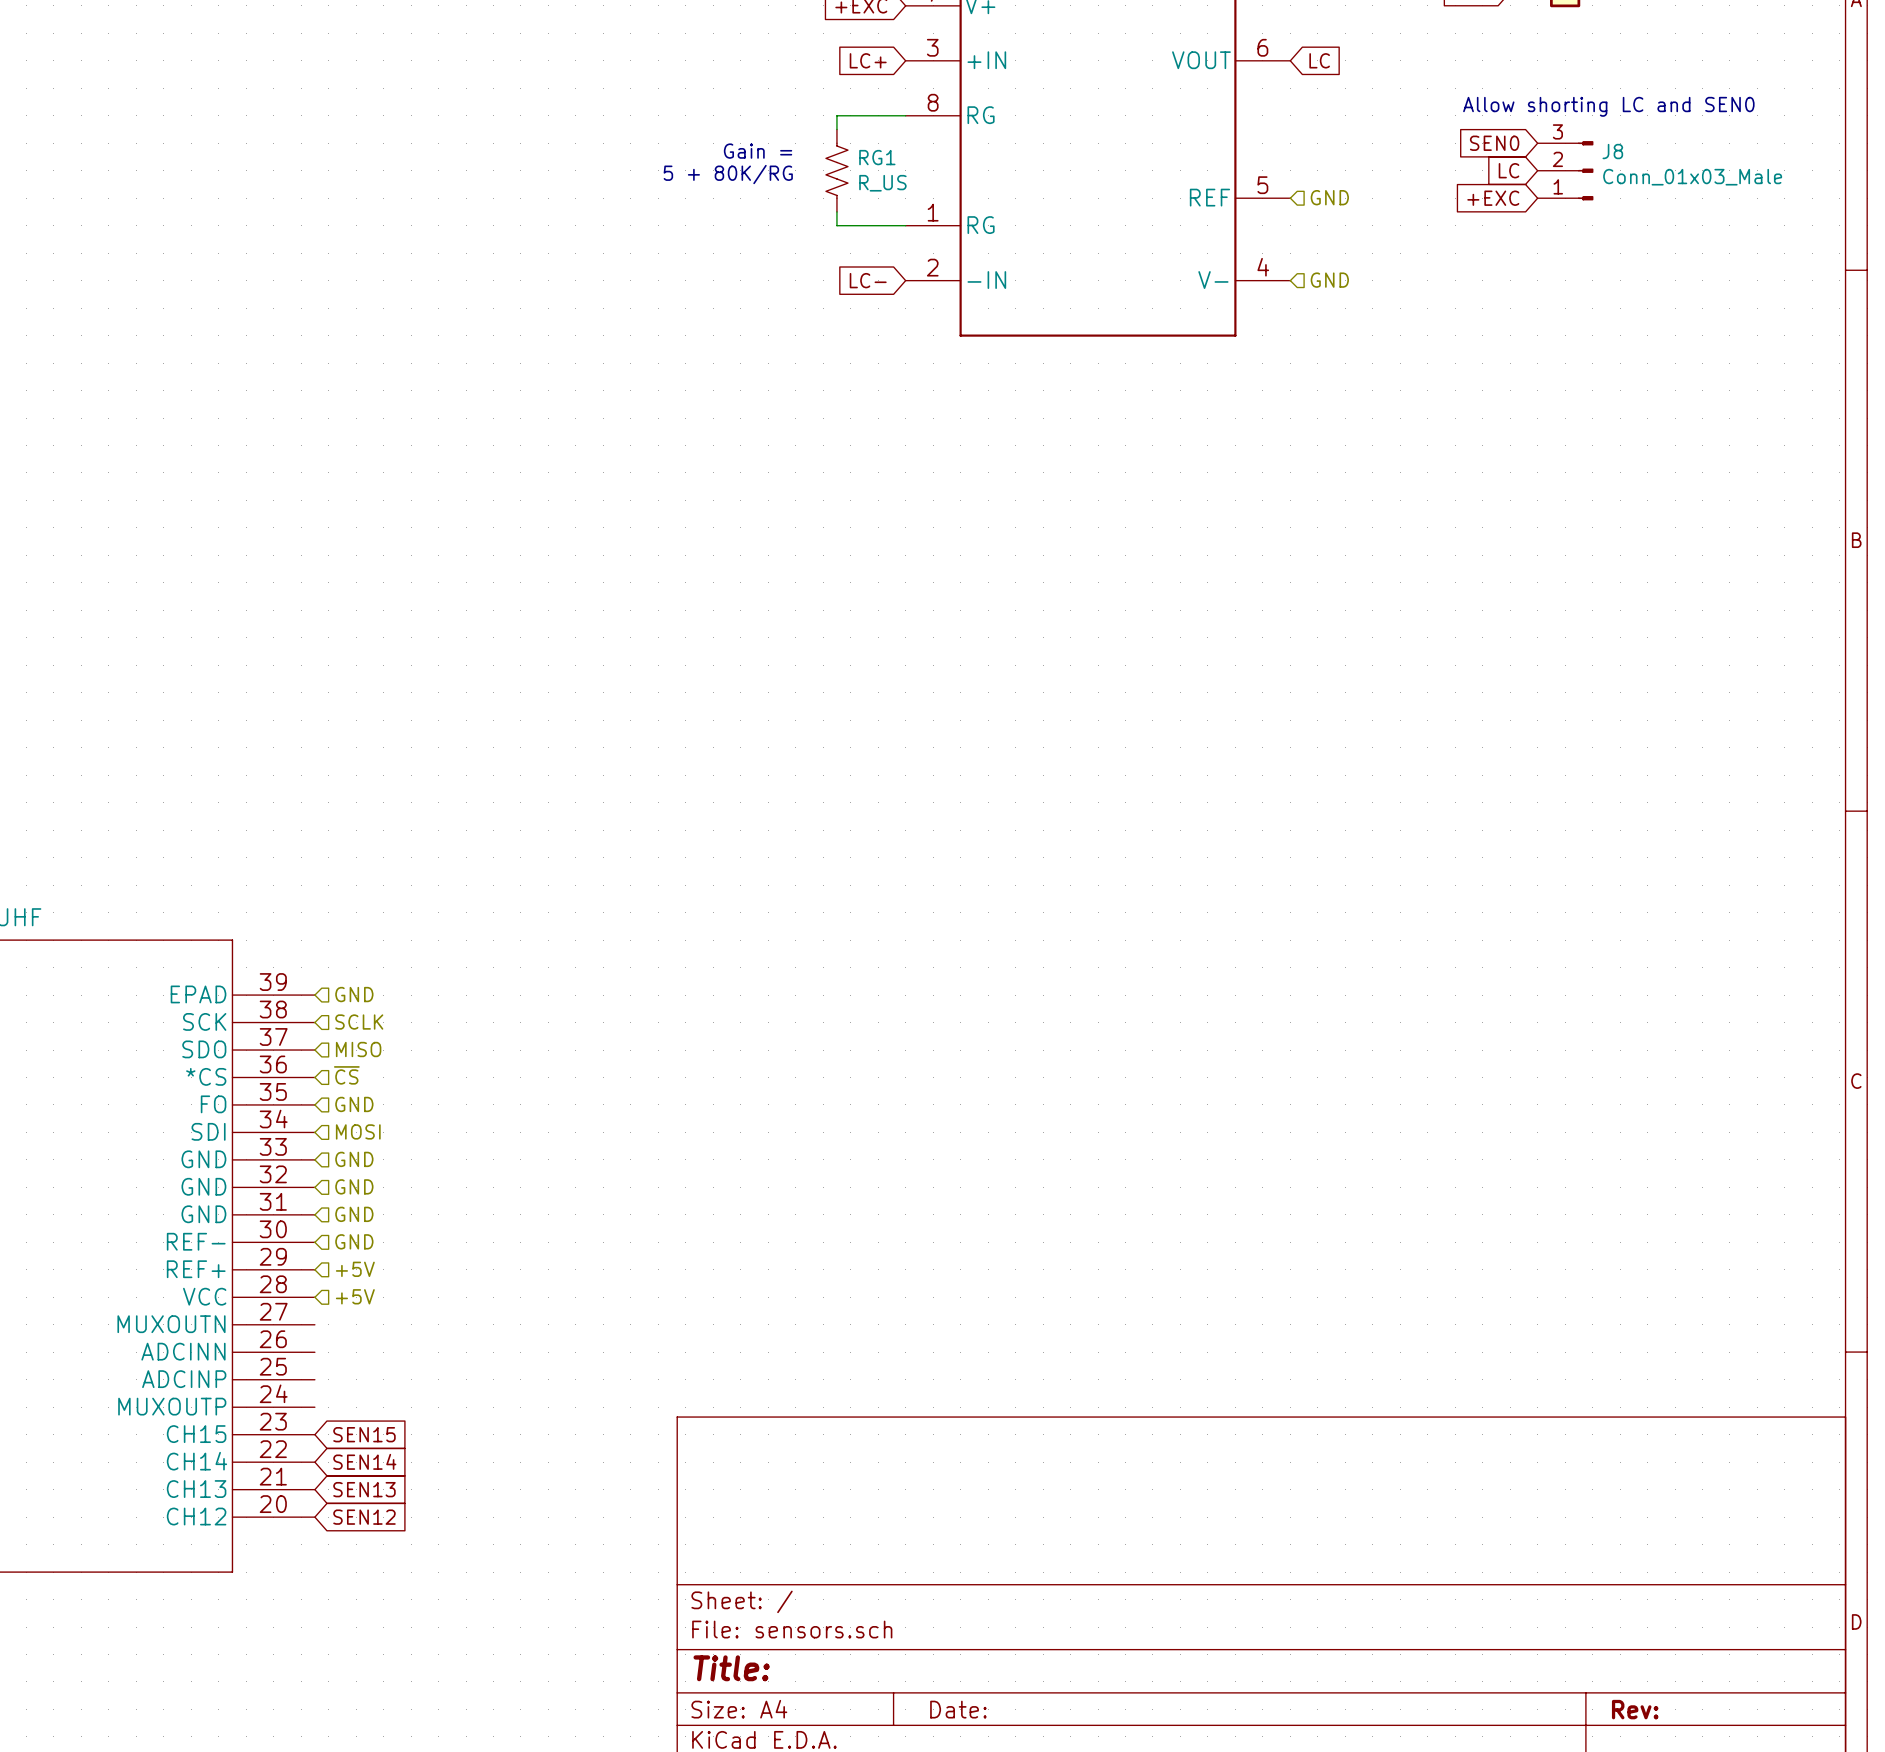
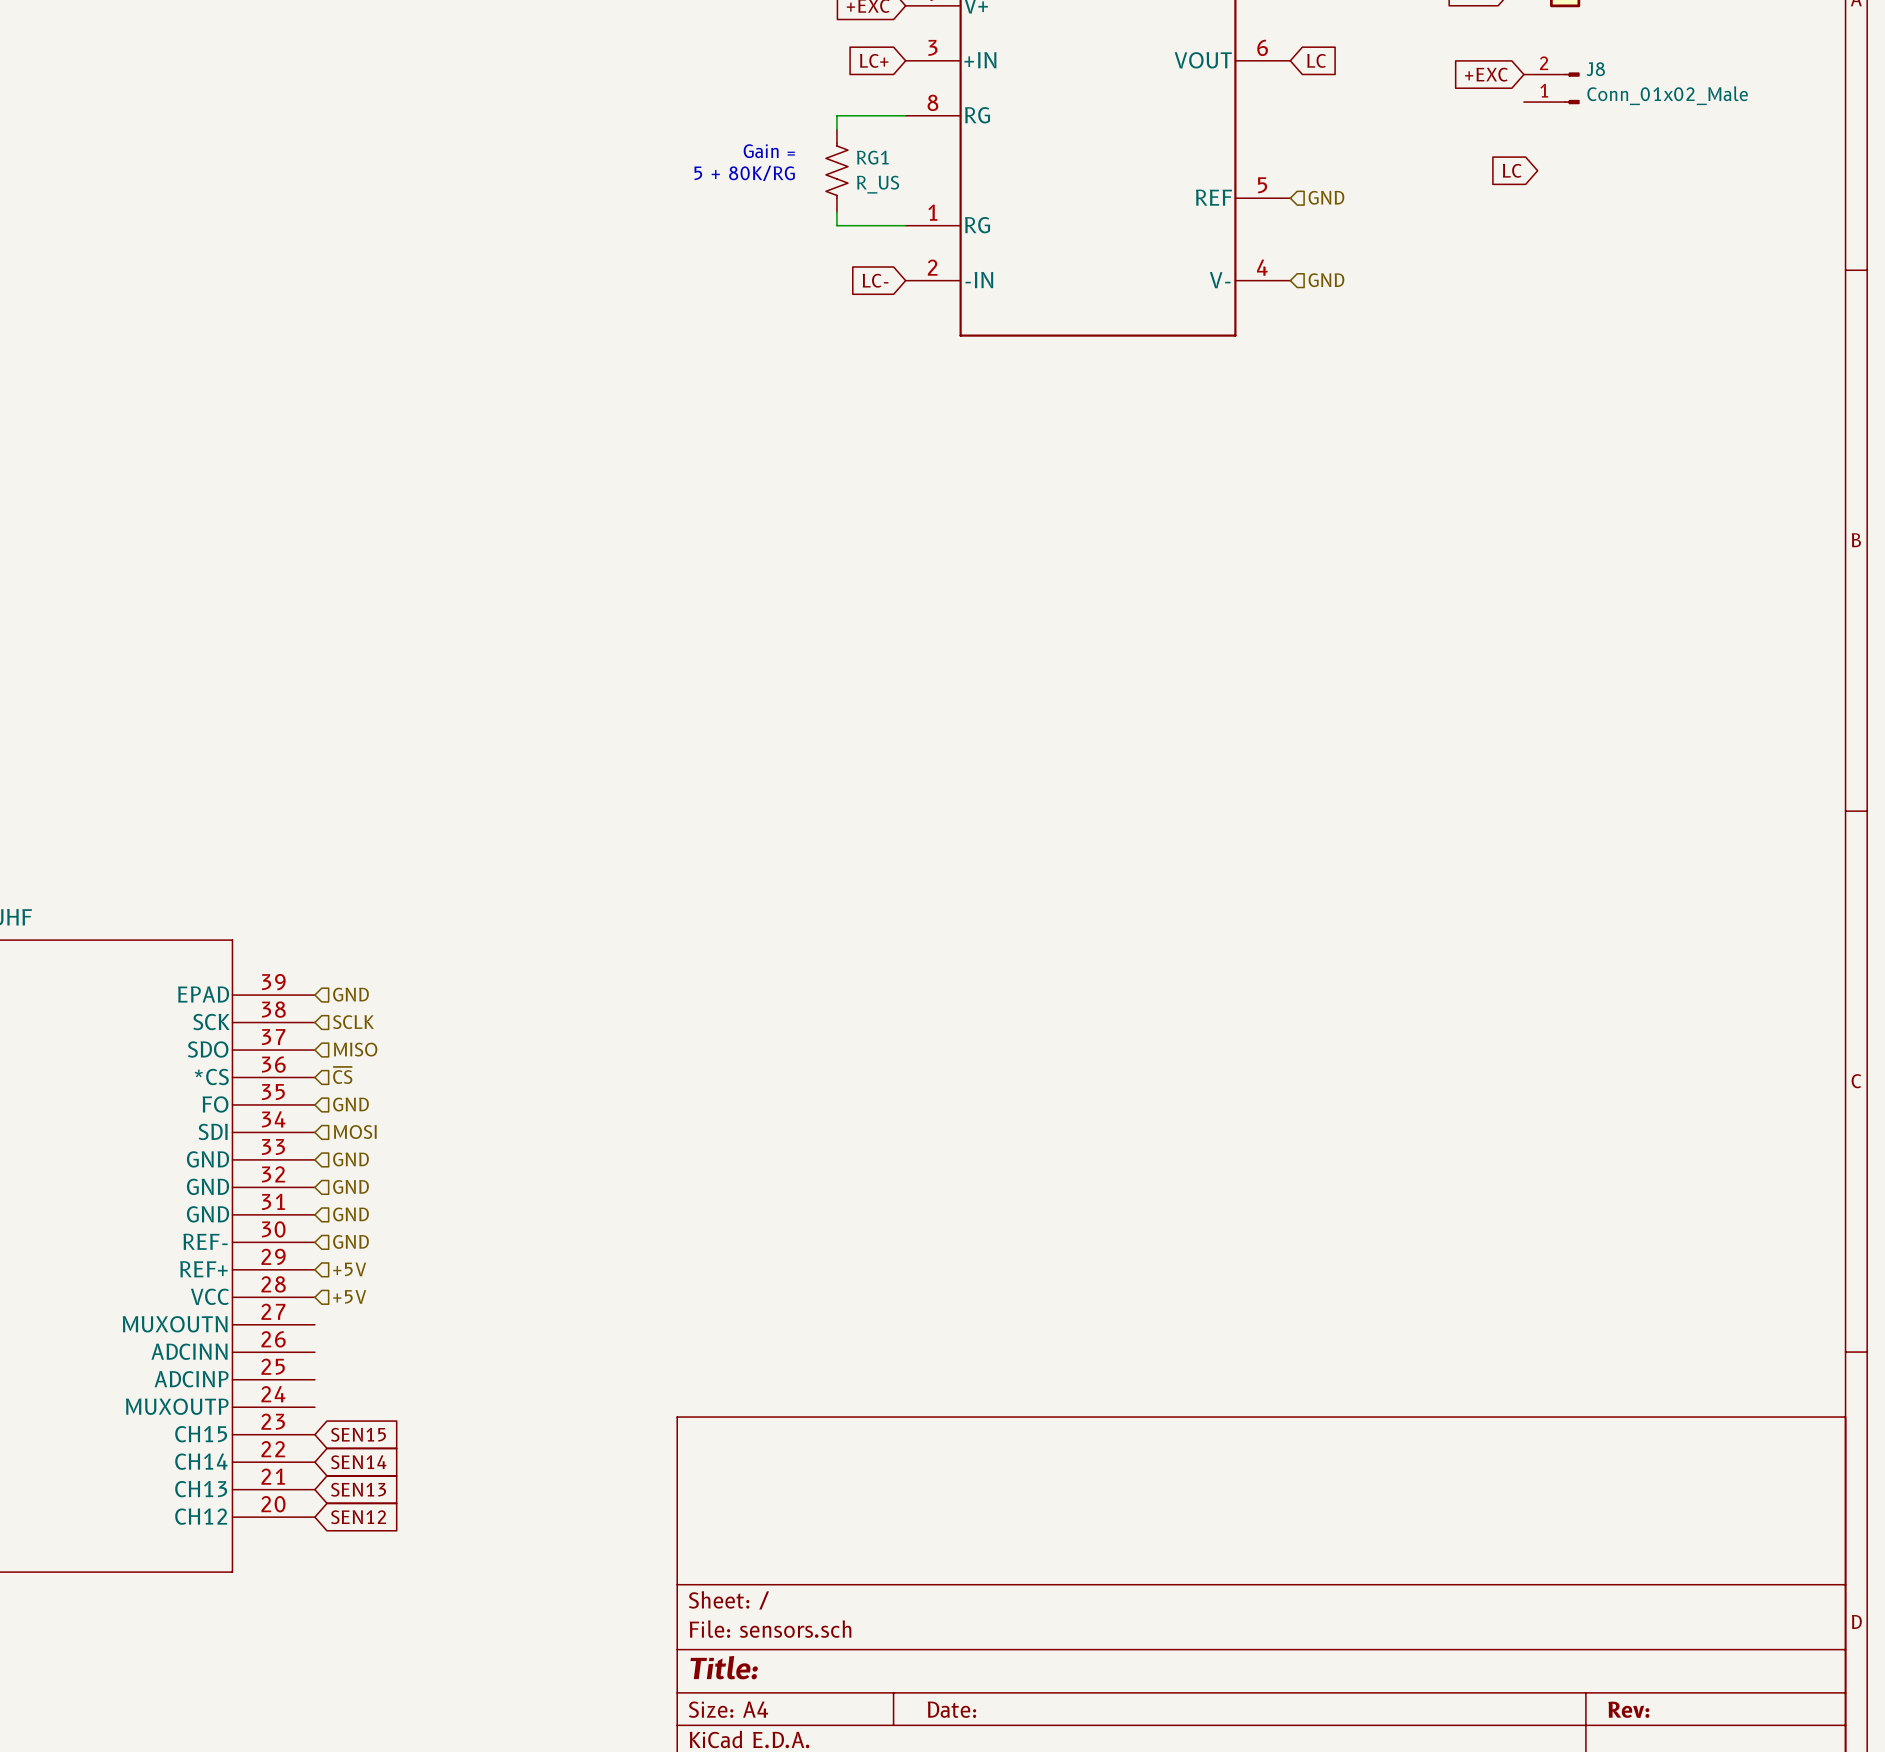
global label: none -> +EXC (1486, 74)
text: Allow shorting LC and SEN0 (1608, 106) -> none
J8 symbol: [1537, 141, 1594, 201] -> [1523, 72, 1580, 105]
global label: SEN0 (1494, 143) -> none
J8 value: Conn_01x03_Male (1692, 177) -> Conn_01x02_Male (1667, 95)
global label: +EXC (1493, 198) -> none

